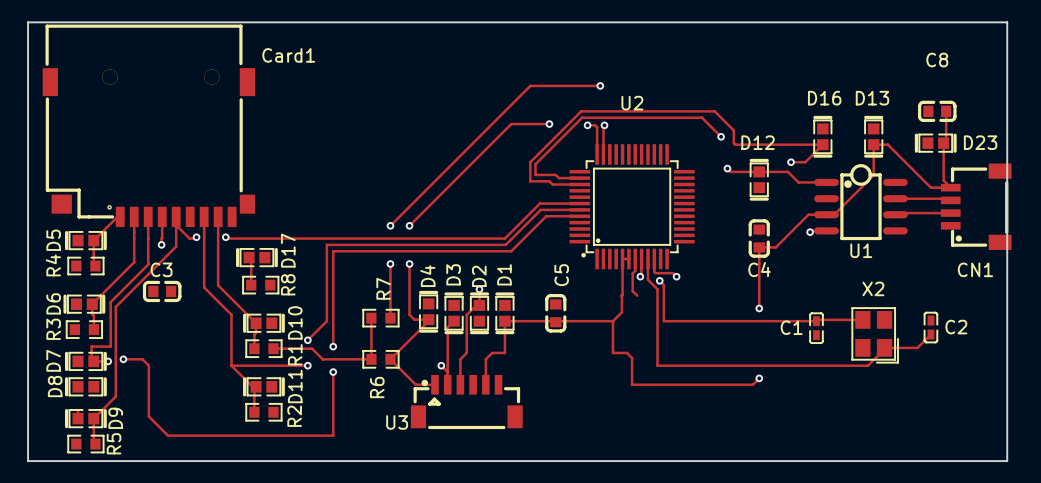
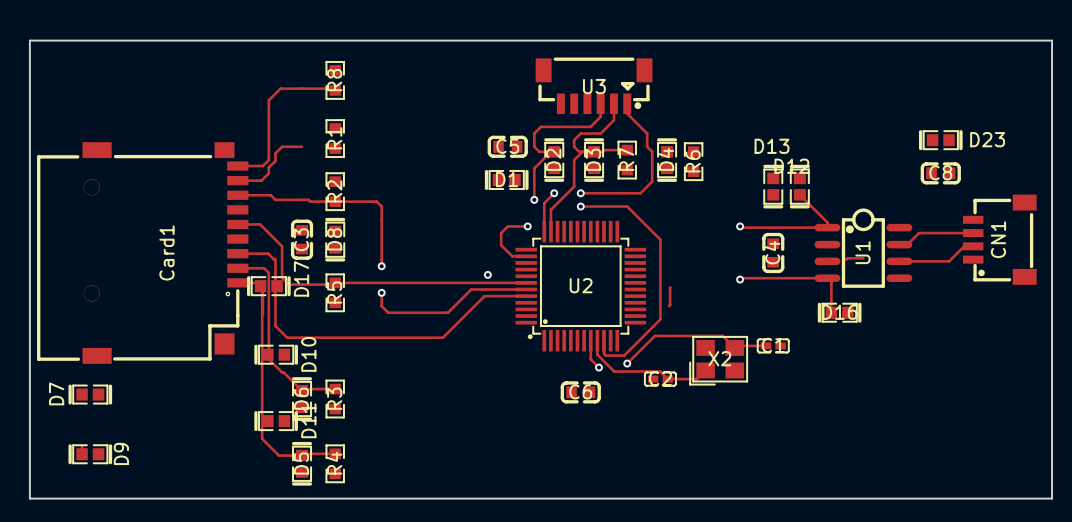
Card1 name position: Card1 (288, 55) -> Card1 (166, 252)
C8 name position: C8 (937, 60) -> C8 (940, 172)
track: none -> (335, 90) (333, 88) (280, 88) (268, 100) (268, 160) (262, 166) (237, 166)
track: none -> (600, 103) (600, 116) (590, 126) (540, 126) (534, 133) (534, 146) (539, 151) (554, 151)
track: none -> (613, 103) (613, 120) (600, 133) (580, 133) (574, 140) (574, 146) (579, 151) (627, 150)
track: none -> (627, 103) (627, 113) (647, 133) (647, 146) (652, 151) (652, 181) (640, 193) (580, 193)
track: (600, 85) (530, 85) (390, 225) -> none
via: (600, 85) -> none
D16 name position: D16 (824, 98) -> D16 (839, 312)
U2 name position: U2 (632, 103) -> U2 (581, 285)
C8 position: (937, 111) -> (940, 173)
track: (946, 111) (943, 180) (950, 187) (930, 187) (887, 144) (873, 144) (873, 175) (834, 214) (808, 214) (775, 247) (759, 247) (759, 308) -> none
track: none -> (302, 146) (282, 146) (275, 153) (275, 160) (268, 167) (268, 173) (261, 180) (237, 180)
track: (549, 124) (511, 124) (409, 225) -> none
via: (549, 124) -> none
Card1 rotation: 0° (148, 125) -> 90° counterclockwise (142, 252)
track: (587, 125) (597, 127) (597, 154) -> none
via: (587, 125) -> none
track: (604, 125) (603, 154) -> none
via: (604, 125) -> none
track: none -> (550, 151) (534, 168) (534, 199)
track: none -> (582, 151) (574, 160) (574, 186) (550, 209) (550, 231)
track: (721, 136) (702, 117) (582, 117) (535, 164) (535, 174) (579, 178) -> none
via: (721, 136) -> none
D16 rotation: 0° (822, 136) -> 90° clockwise (839, 312)
D16 position: (822, 136) -> (839, 312)
D13 position: (873, 136) -> (773, 186)
D23 position: (935, 143) -> (940, 140)
track: (791, 162) (805, 162) (822, 144) (735, 144) (733, 130) (714, 111) (581, 111) (530, 162) (530, 181) (549, 181) (552, 184) (579, 184) -> none
via: (791, 162) -> none
track: none -> (554, 193) (544, 203) (544, 231)
via: none -> (554, 193)
via: none -> (580, 193)
track: (727, 168) (730, 171) (787, 171) (798, 182) (826, 182) -> none
via: (727, 168) -> none
track: none -> (237, 195) (270, 195) (275, 199) (308, 199) (310, 201) (376, 201) (381, 206) (381, 266)
track: none -> (799, 194) (827, 222) (827, 227) (740, 226)
via: none -> (534, 199)
D12 position: (759, 179) -> (799, 186)
track: none -> (580, 206) (627, 206) (660, 239) (660, 319) (624, 355) (605, 355) (604, 353) (604, 340)
via: none -> (580, 206)
track: none -> (237, 224) (260, 224) (282, 246) (282, 277) (288, 284) (526, 282)
track: (895, 198) (949, 198) (950, 200) -> none
track: none -> (527, 226) (507, 226) (501, 233) (501, 245) (512, 256) (526, 256)
via: none -> (527, 226)
via: none -> (740, 226)
U1 position: (860, 202) -> (863, 248)
track: (579, 203) (539, 203) (504, 238) (225, 237) -> none
U2 position: (632, 206) -> (580, 286)
track: none -> (973, 233) (918, 233) (907, 244) (899, 244)
CN1 position: (976, 206) -> (999, 239)
track: (579, 209) (540, 209) (505, 244) (326, 244) (326, 321) (307, 340) -> none
track: (950, 213) (897, 213) (895, 214) -> none
track: (120, 216) (117, 216) (93, 240) (93, 264) (95, 266) -> none
track: (134, 216) (134, 262) (92, 304) (93, 329) -> none
track: (148, 216) (148, 263) (110, 302) (110, 346) (91, 346) (91, 359) (93, 361) (108, 361) -> none
track: (162, 216) (161, 244) -> none
track: (176, 216) (176, 246) (115, 306) (115, 396) (93, 418) (93, 442) (95, 444) -> none
track: (204, 216) (204, 287) (231, 314) (231, 365) -> none
track: (218, 216) (218, 285) (256, 323) (254, 348) -> none
track: (579, 216) (546, 216) (511, 251) (333, 251) (333, 346) -> none
track: none -> (973, 246) (964, 246) (949, 261) (899, 261)
track: (176, 225) (189, 238) (197, 238) (196, 237) -> none
via: (390, 225) -> none
via: (409, 225) -> none
track: none -> (237, 253) (268, 253) (275, 259) (275, 326) (287, 337) (443, 337) (484, 296) (526, 296)
via: (810, 232) -> none
via: (196, 237) -> none
via: (225, 237) -> none
via: none -> (381, 266)
C4 position: (759, 238) -> (773, 252)
D5 name position: D5 (53, 240) -> D5 (301, 463)
D5 rotation: 0° (85, 240) -> 90° clockwise (302, 463)
D5 position: (85, 240) -> (302, 463)
track: none -> (237, 268) (264, 268) (268, 272) (268, 359) (302, 390) (303, 389) (335, 389)
via: (161, 244) -> none
via: none -> (487, 274)
U1 name rotation: 0° (861, 250) -> 90° counterclockwise (862, 252)
U1 name position: U1 (861, 250) -> U1 (862, 252)
track: none -> (740, 279) (827, 278) (831, 282) (831, 312)
via: none -> (740, 279)
track: none -> (237, 282) (258, 282) (262, 286) (262, 438) (278, 455) (335, 453)
track: (628, 259) (622, 259) (621, 312) (613, 321) -> none
track: (635, 259) (632, 291) (637, 295) -> none
track: (647, 259) (647, 279) (657, 289) (657, 365) (867, 365) (884, 347) (917, 347) (930, 334) -> none
track: (654, 259) (655, 273) (673, 273) (676, 276) -> none
track: none -> (526, 289) (471, 289) (448, 312) (388, 312) (381, 306) (381, 292)
via: none -> (381, 292)
track: (390, 263) (390, 318) -> none
via: (390, 263) -> none
track: (409, 263) (409, 314) (414, 319) (428, 319) (428, 321) (390, 359) (415, 384) (434, 384) -> none
via: (409, 263) -> none
R4 name position: R4 (53, 265) -> R4 (334, 463)
R4 rotation: 0° (85, 266) -> 90° clockwise (335, 463)
R4 position: (85, 266) -> (335, 463)
C4 name rotation: 0° (759, 269) -> 90° counterclockwise (772, 252)
C4 name position: C4 (759, 269) -> C4 (772, 252)
CN1 name rotation: 0° (975, 269) -> 90° counterclockwise (998, 239)
CN1 name position: CN1 (975, 269) -> CN1 (998, 239)
D3 name position: D3 (453, 274) -> D3 (593, 159)
D1 name position: D1 (504, 274) -> D1 (507, 179)
C5 name position: C5 (561, 275) -> C5 (507, 146)
D4 name position: D4 (427, 276) -> D4 (666, 159)
D2 name position: D2 (479, 276) -> D2 (553, 159)
via: (640, 276) -> none
via: (676, 276) -> none
track: (659, 280) (663, 284) (663, 321) (862, 319) -> none
via: (659, 280) -> none
R8 name position: R8 (288, 284) -> R8 (334, 80)
R8 rotation: 0° (260, 285) -> 90° clockwise (335, 80)
R8 position: (260, 285) -> (335, 80)
R7 name position: R7 (383, 288) -> R7 (626, 159)
X2 name position: X2 (873, 288) -> X2 (719, 358)
track: (479, 289) (479, 305) (476, 305) (466, 314) (466, 352) (460, 359) (460, 384) -> none
via: (479, 289) -> none
C3 rotation: 0° (162, 291) -> 90° clockwise (302, 239)
C3 position: (162, 291) -> (302, 239)
D6 name position: D6 (53, 303) -> D6 (301, 398)
D6 rotation: 0° (84, 304) -> 90° clockwise (302, 399)
D6 position: (84, 304) -> (302, 399)
via: (759, 308) -> none
track: none -> (590, 340) (590, 359) (598, 367)
track: none -> (597, 340) (597, 354) (614, 371) (660, 371) (667, 379) (696, 379) (705, 370)
D4 position: (428, 311) -> (667, 160)
D3 position: (454, 313) -> (594, 160)
D2 position: (479, 313) -> (554, 160)
D1 rotation: 0° (504, 313) -> 90° clockwise (506, 179)
D1 position: (504, 313) -> (506, 179)
C5 rotation: 0° (555, 313) -> 90° clockwise (507, 146)
C5 position: (555, 313) -> (507, 146)
track: none -> (765, 345) (736, 345) (734, 347) (722, 335) (654, 335) (627, 363)
track: (371, 318) (371, 359) (322, 359) (312, 348) (273, 348) -> none
R7 rotation: 0° (380, 318) -> 90° clockwise (627, 160)
R7 position: (380, 318) -> (627, 160)
track: (454, 321) (447, 327) (447, 384) -> none
track: (613, 321) (504, 321) (504, 352) (492, 352) (485, 359) (485, 384) -> none
track: (613, 321) (613, 352) (627, 352) (632, 358) (632, 384) (752, 384) (759, 378) -> none
C2 rotation: 0° (930, 327) -> 90° clockwise (660, 379)
C2 position: (930, 327) -> (660, 379)
C1 rotation: 0° (816, 328) -> 90° clockwise (773, 345)
C1 position: (816, 328) -> (773, 345)
R3 name position: R3 (53, 329) -> R3 (334, 398)
R3 rotation: 0° (84, 329) -> 90° clockwise (335, 399)
R3 position: (84, 329) -> (335, 399)
via: none -> (627, 363)
via: none -> (598, 367)
X2 rotation: 0° (875, 335) -> 90° clockwise (718, 360)
X2 position: (875, 335) -> (718, 360)
via: (307, 340) -> none
via: (333, 346) -> none
R1 rotation: 0° (263, 348) -> 90° clockwise (335, 138)
R1 position: (263, 348) -> (335, 138)
R1 name position: R1 (295, 354) -> R1 (334, 138)
track: (123, 359) (142, 359) (148, 365) (148, 416) (167, 435) (333, 435) (333, 372) -> none
via: (123, 359) -> none
R6 rotation: 0° (380, 359) -> 90° clockwise (693, 161)
R6 position: (380, 359) -> (693, 161)
C6: none -> (580, 392)
via: (108, 361) -> none
track: (231, 365) (307, 365) -> none
track: (231, 365) (252, 386) (256, 386) (254, 388) (254, 412) -> none
via: (307, 365) -> none
track: (441, 365) (447, 372) -> none
via: (441, 365) -> none
via: (333, 372) -> none
via: (759, 378) -> none
D8 name position: D8 (55, 386) -> D8 (334, 239)
D8 rotation: 0° (85, 386) -> 90° clockwise (335, 239)
D8 position: (85, 386) -> (335, 239)
R6 name position: R6 (377, 387) -> R6 (693, 161)
U3 rotation: 0° (466, 402) -> 180° (594, 85)
U3 position: (466, 402) -> (594, 85)
R2 rotation: 0° (263, 412) -> 90° clockwise (335, 191)
R2 position: (263, 412) -> (335, 191)
R2 name position: R2 (294, 416) -> R2 (334, 191)
U3 name position: U3 (397, 422) -> U3 (594, 86)
R5 name position: R5 (114, 443) -> R5 (334, 292)
R5 rotation: 0° (85, 444) -> 90° clockwise (335, 292)
R5 position: (85, 444) -> (335, 292)

